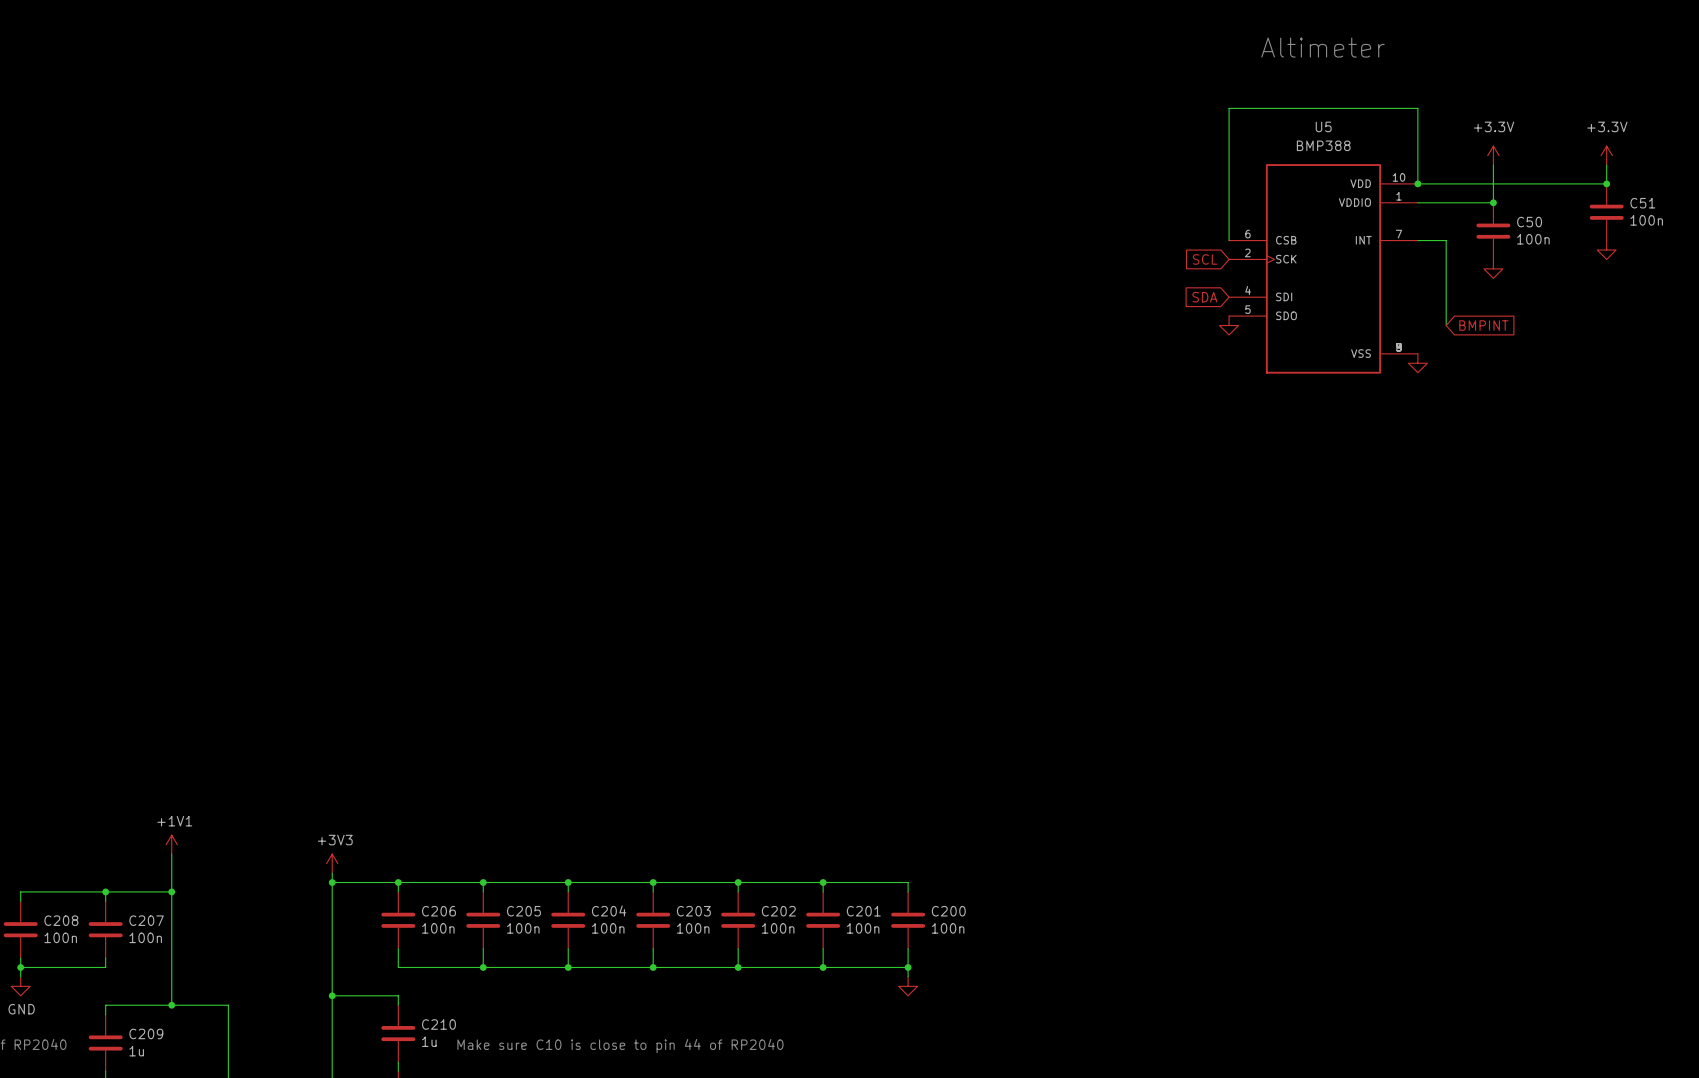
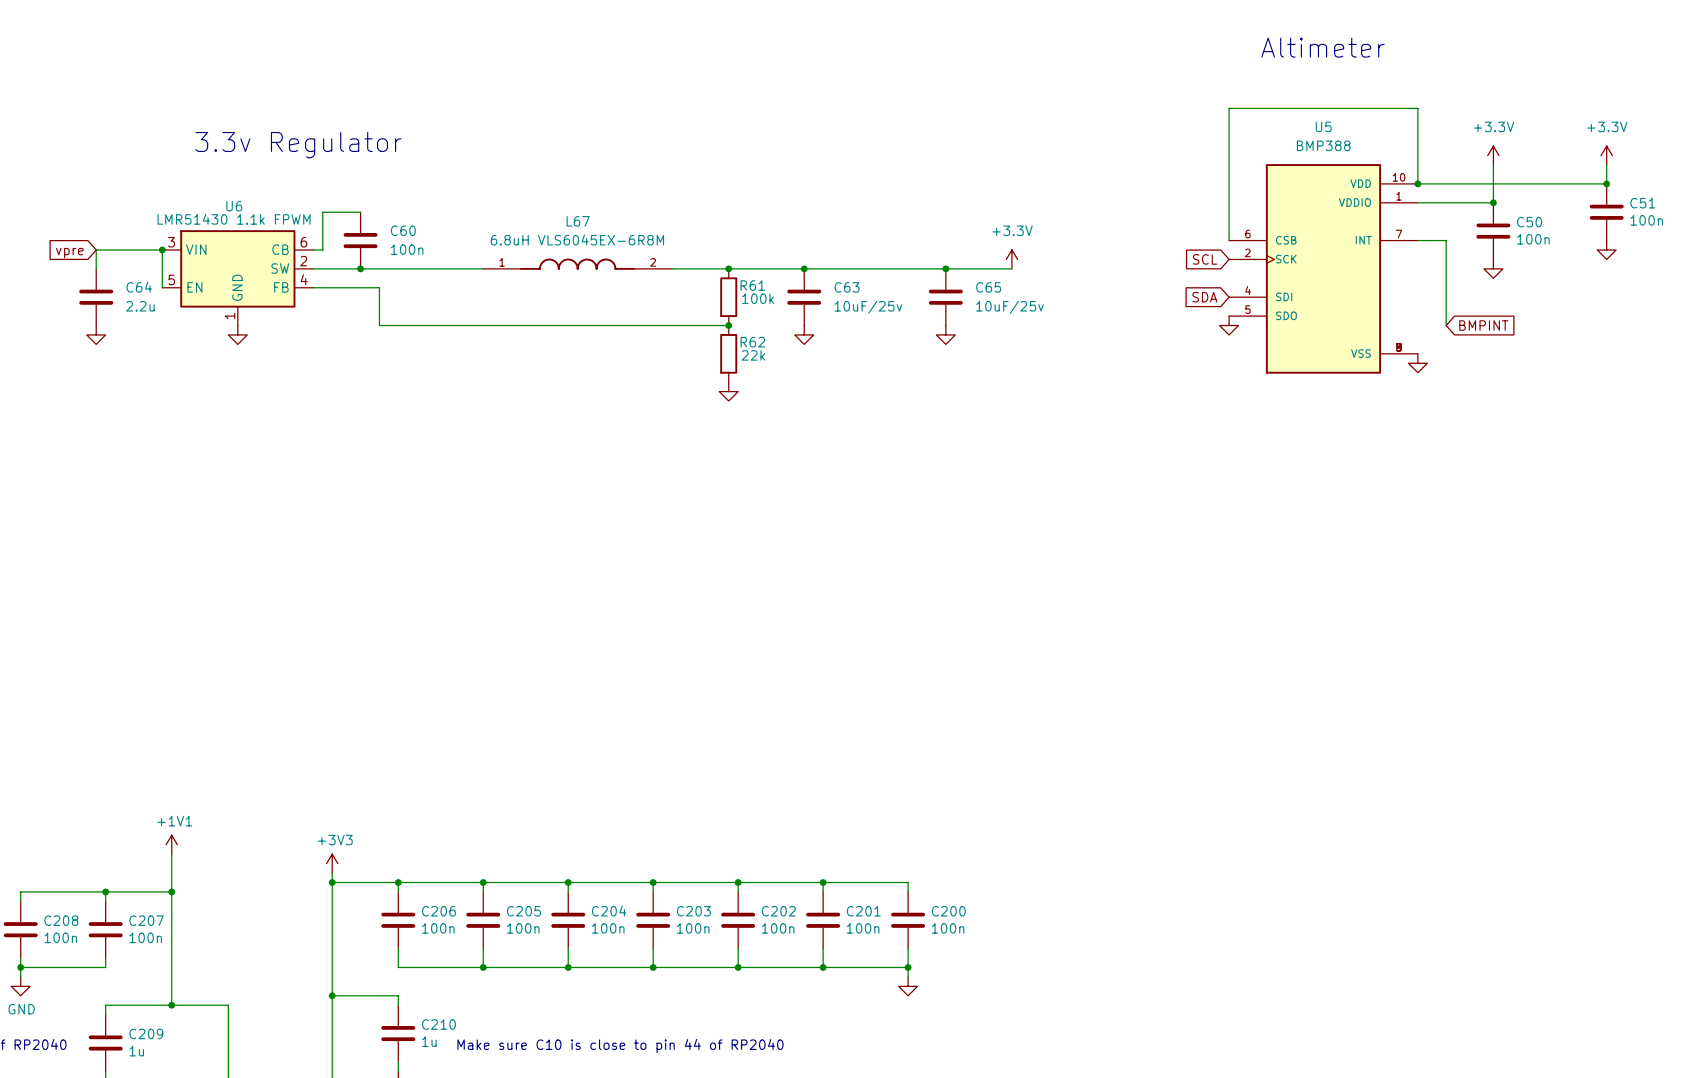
text: none -> 3.3v Regulator (298, 145)
wire: none -> (360, 212) (322, 212) (322, 250) (313, 250)
C60: none -> 100n (360, 240)
junction: none -> (162, 250)
global label: none -> vpre (69, 253)
power symbol: none -> +3.3V (1011, 259)
L67: none -> 6.8uH VLS6045EX-6R8M (577, 264)
wire: none -> (96, 268) (96, 250) (162, 250) (162, 287)
wire: none -> (313, 268) (483, 268)
junction: none -> (360, 268)
wire: none -> (672, 268) (1011, 268)
junction: none -> (728, 268)
junction: none -> (804, 268)
junction: none -> (945, 268)
U6: none -> LMR51430 1.1k FPWM (237, 277)
wire: none -> (313, 287) (379, 287) (379, 325) (728, 325)
C64: none -> 2.2u (96, 297)
R61: none -> 100k (728, 297)
C63: none -> 10uF/25v (804, 297)
C65: none -> 10uF/25v (945, 297)
junction: none -> (728, 325)
power symbol: none -> (96, 334)
power symbol: none -> (237, 334)
power symbol: none -> (804, 334)
power symbol: none -> (945, 334)
R62: none -> 22k (728, 353)
power symbol: none -> (728, 391)

